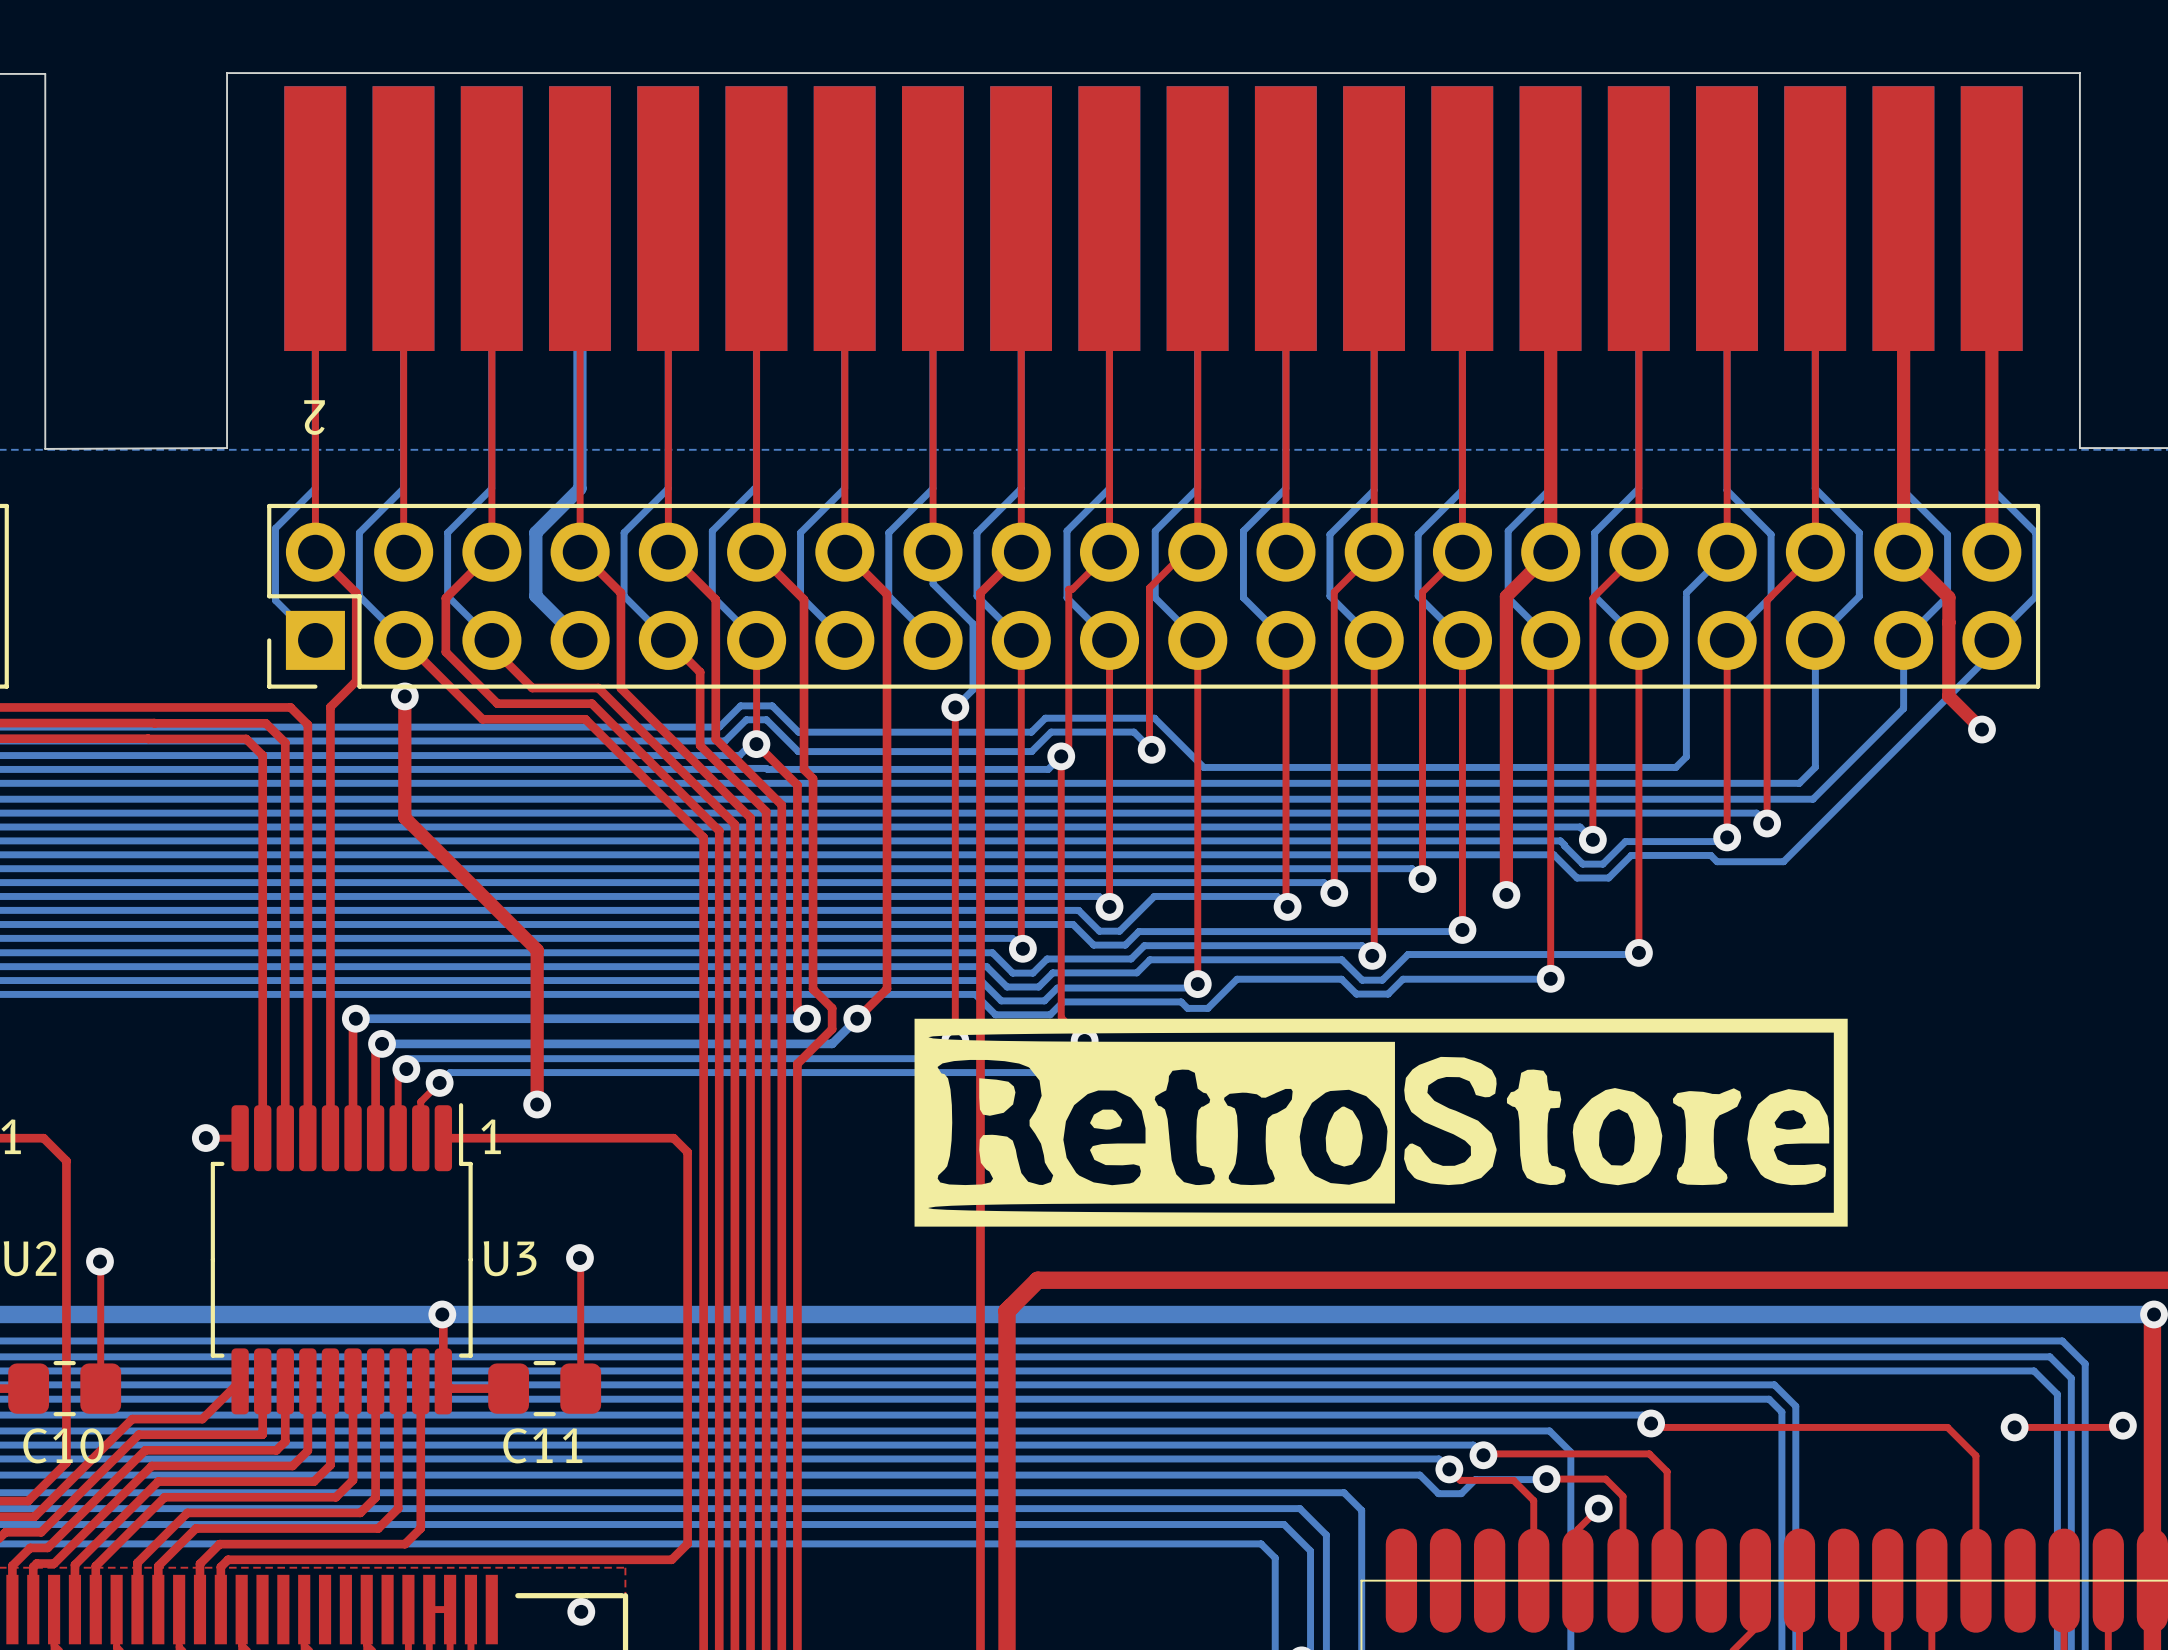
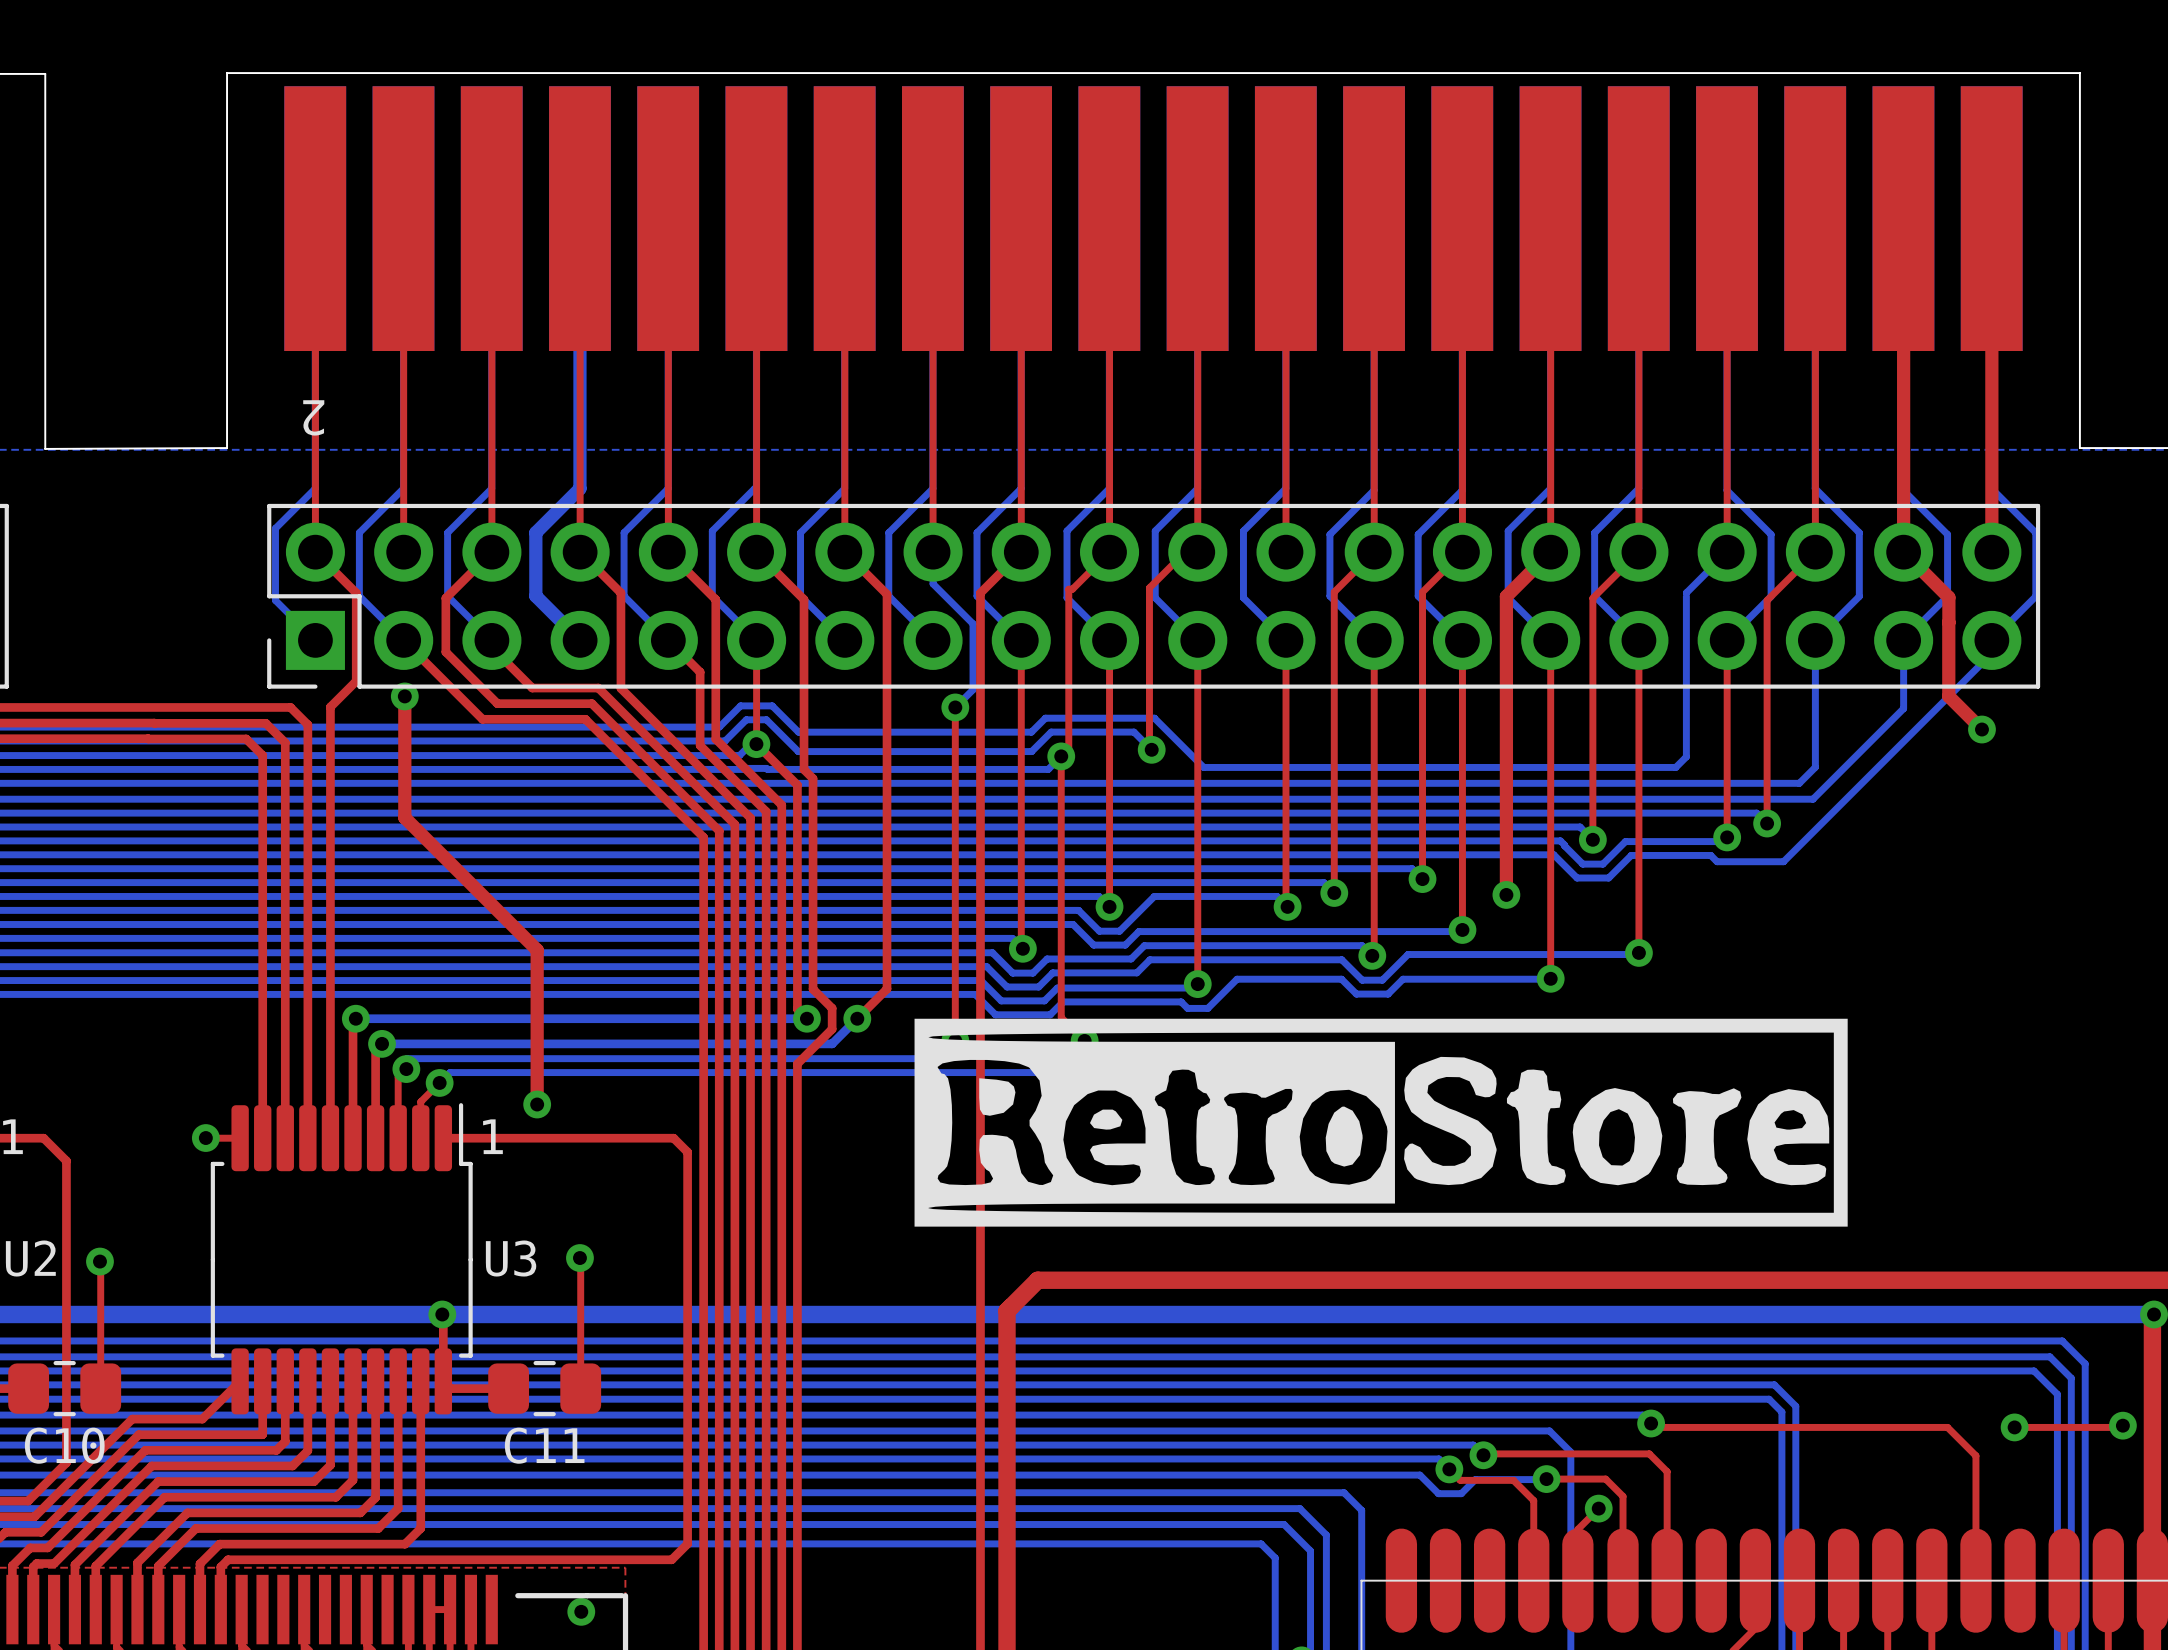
top track width: thick (1550, 218) (1550, 552) -> thin (1550, 218) (1550, 552)

